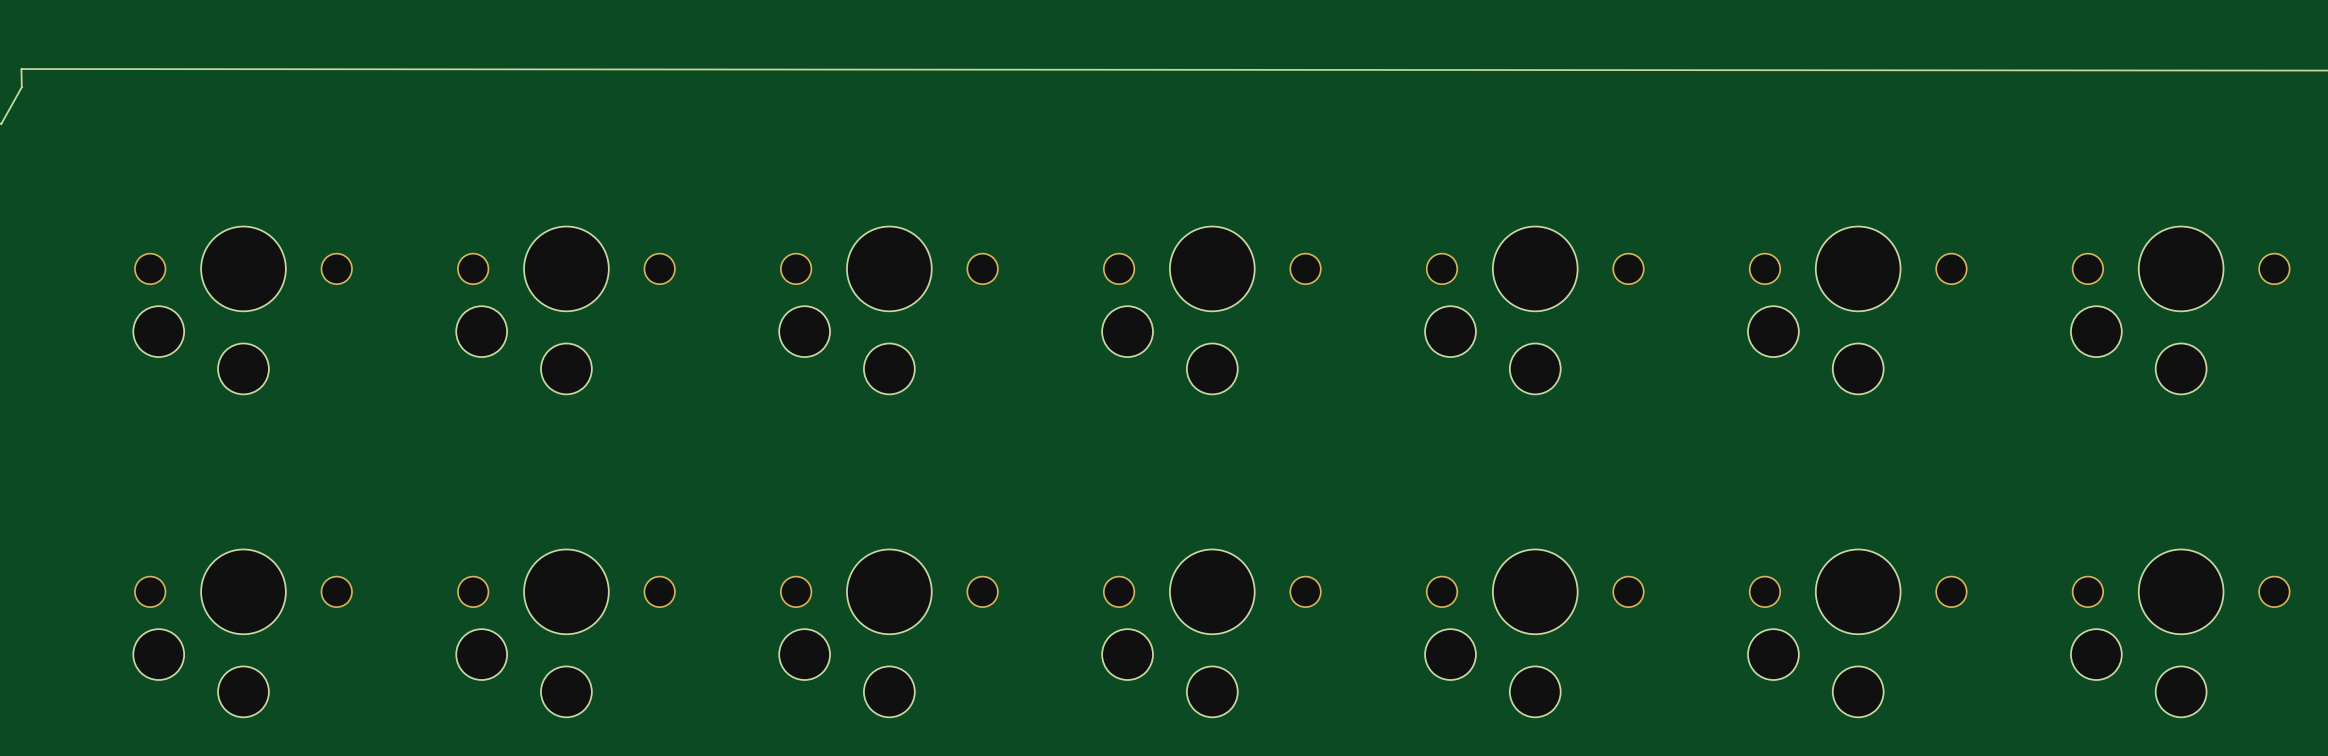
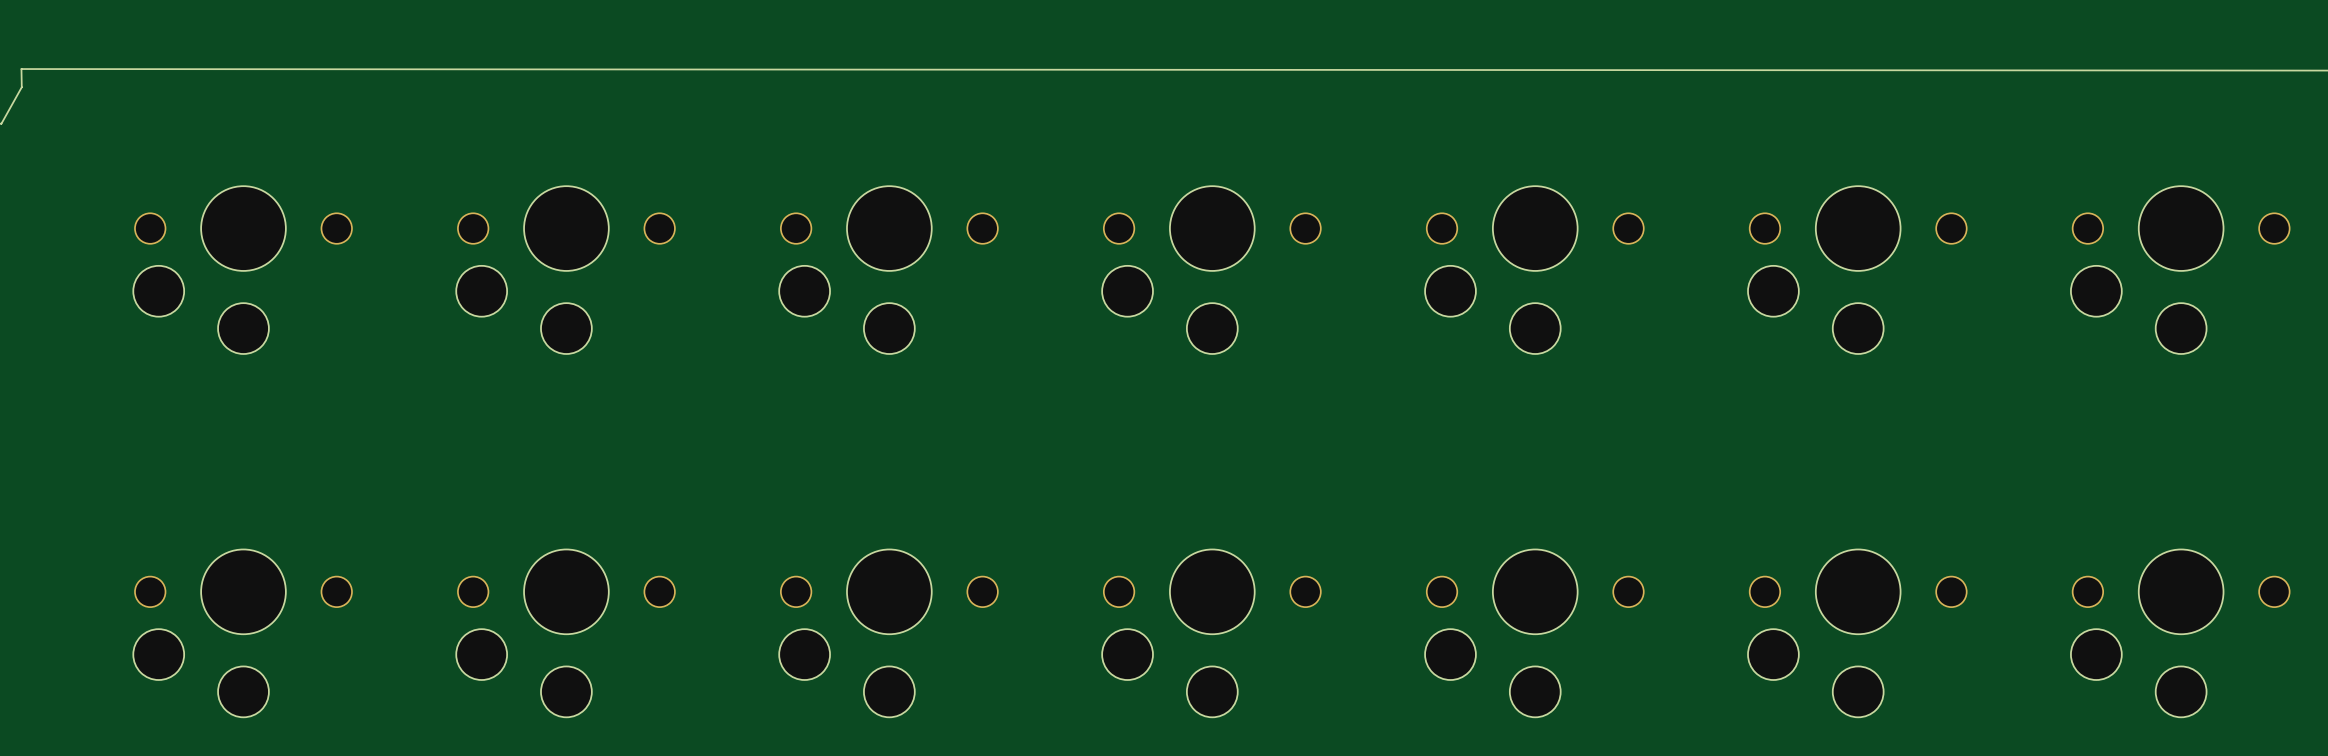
part position: (243, 310) -> (243, 270)
part position: (566, 310) -> (566, 270)
part position: (888, 310) -> (888, 270)
part position: (1211, 310) -> (1211, 270)
part position: (1534, 310) -> (1534, 270)
part position: (1857, 310) -> (1857, 270)
part position: (2180, 310) -> (2180, 270)

